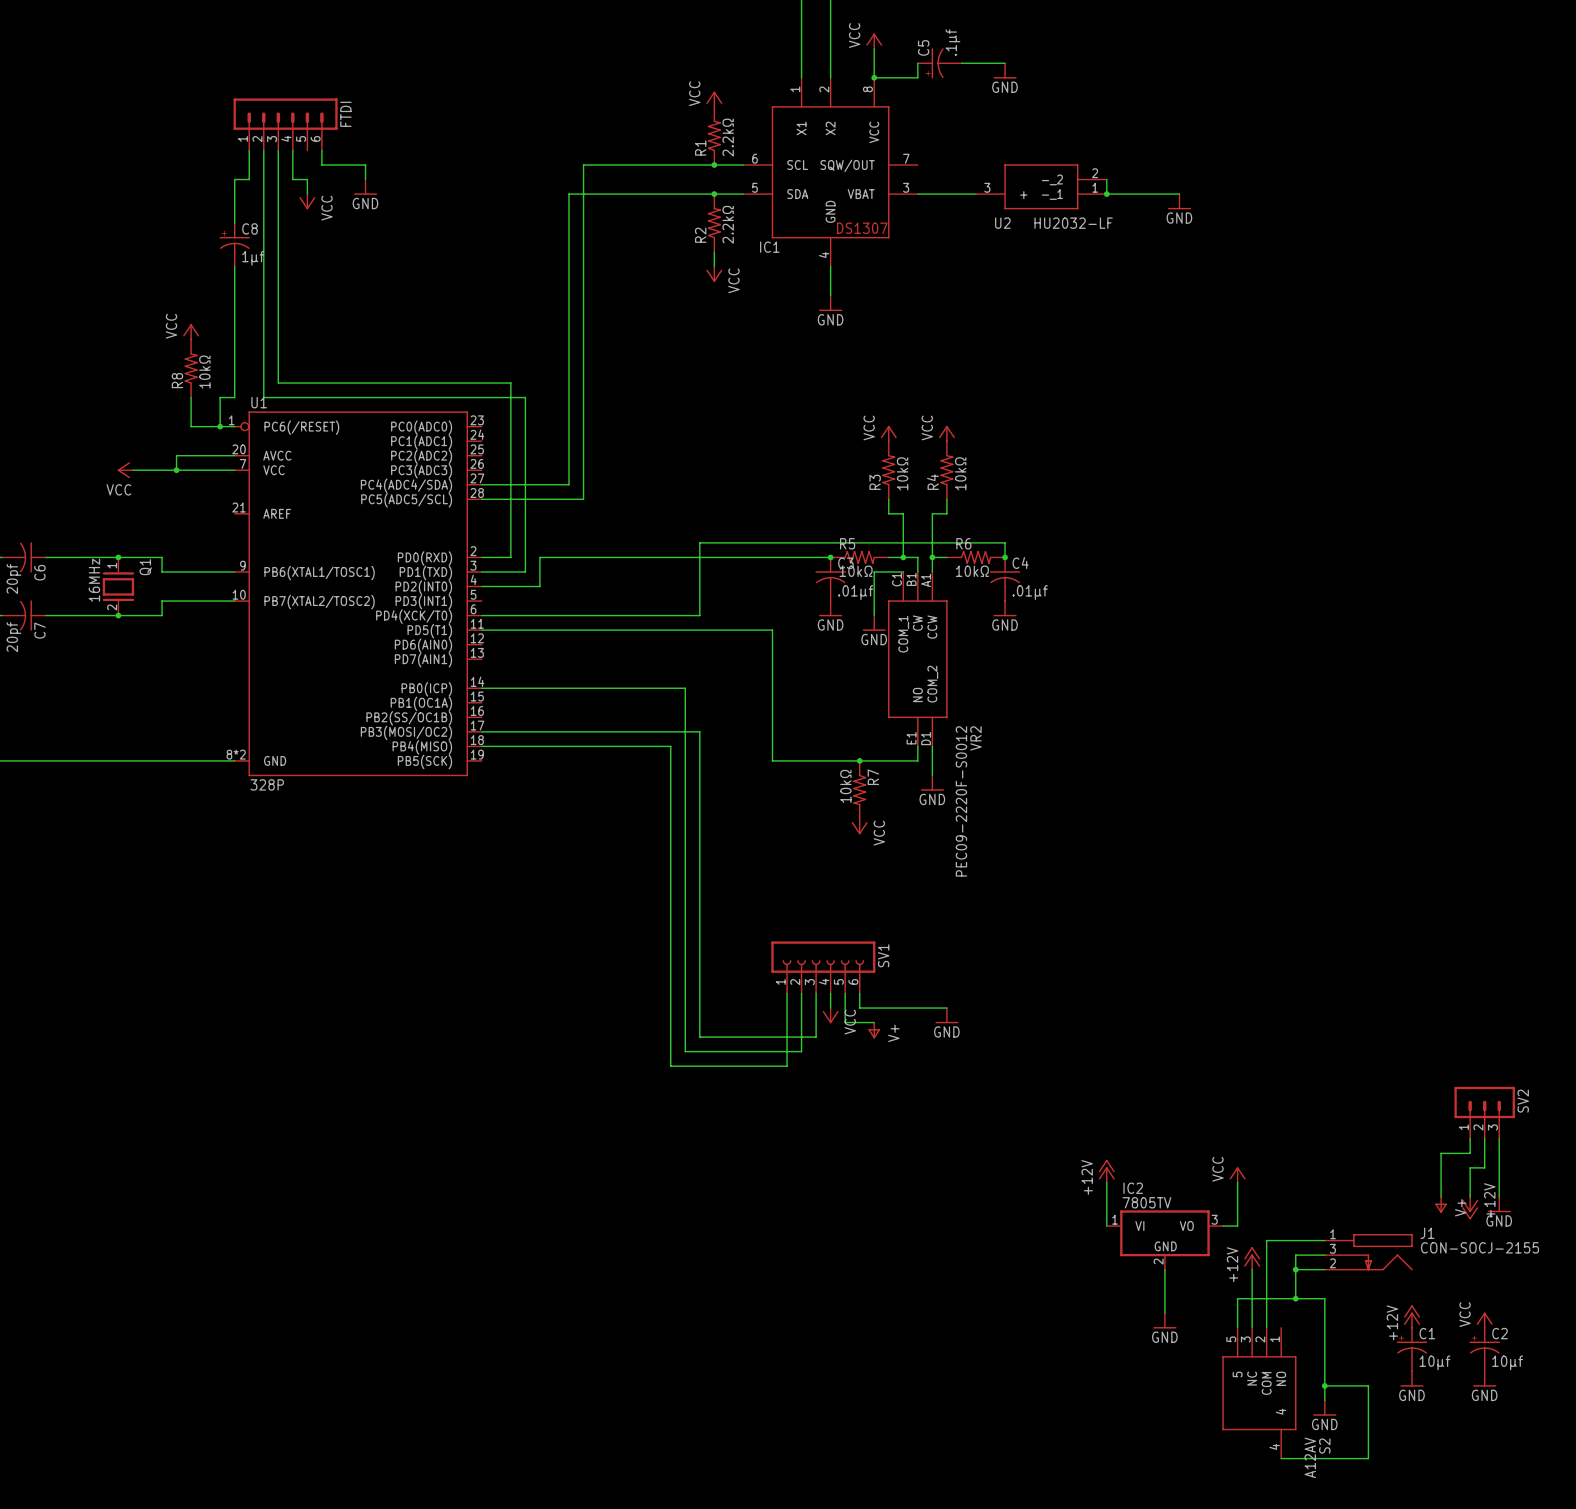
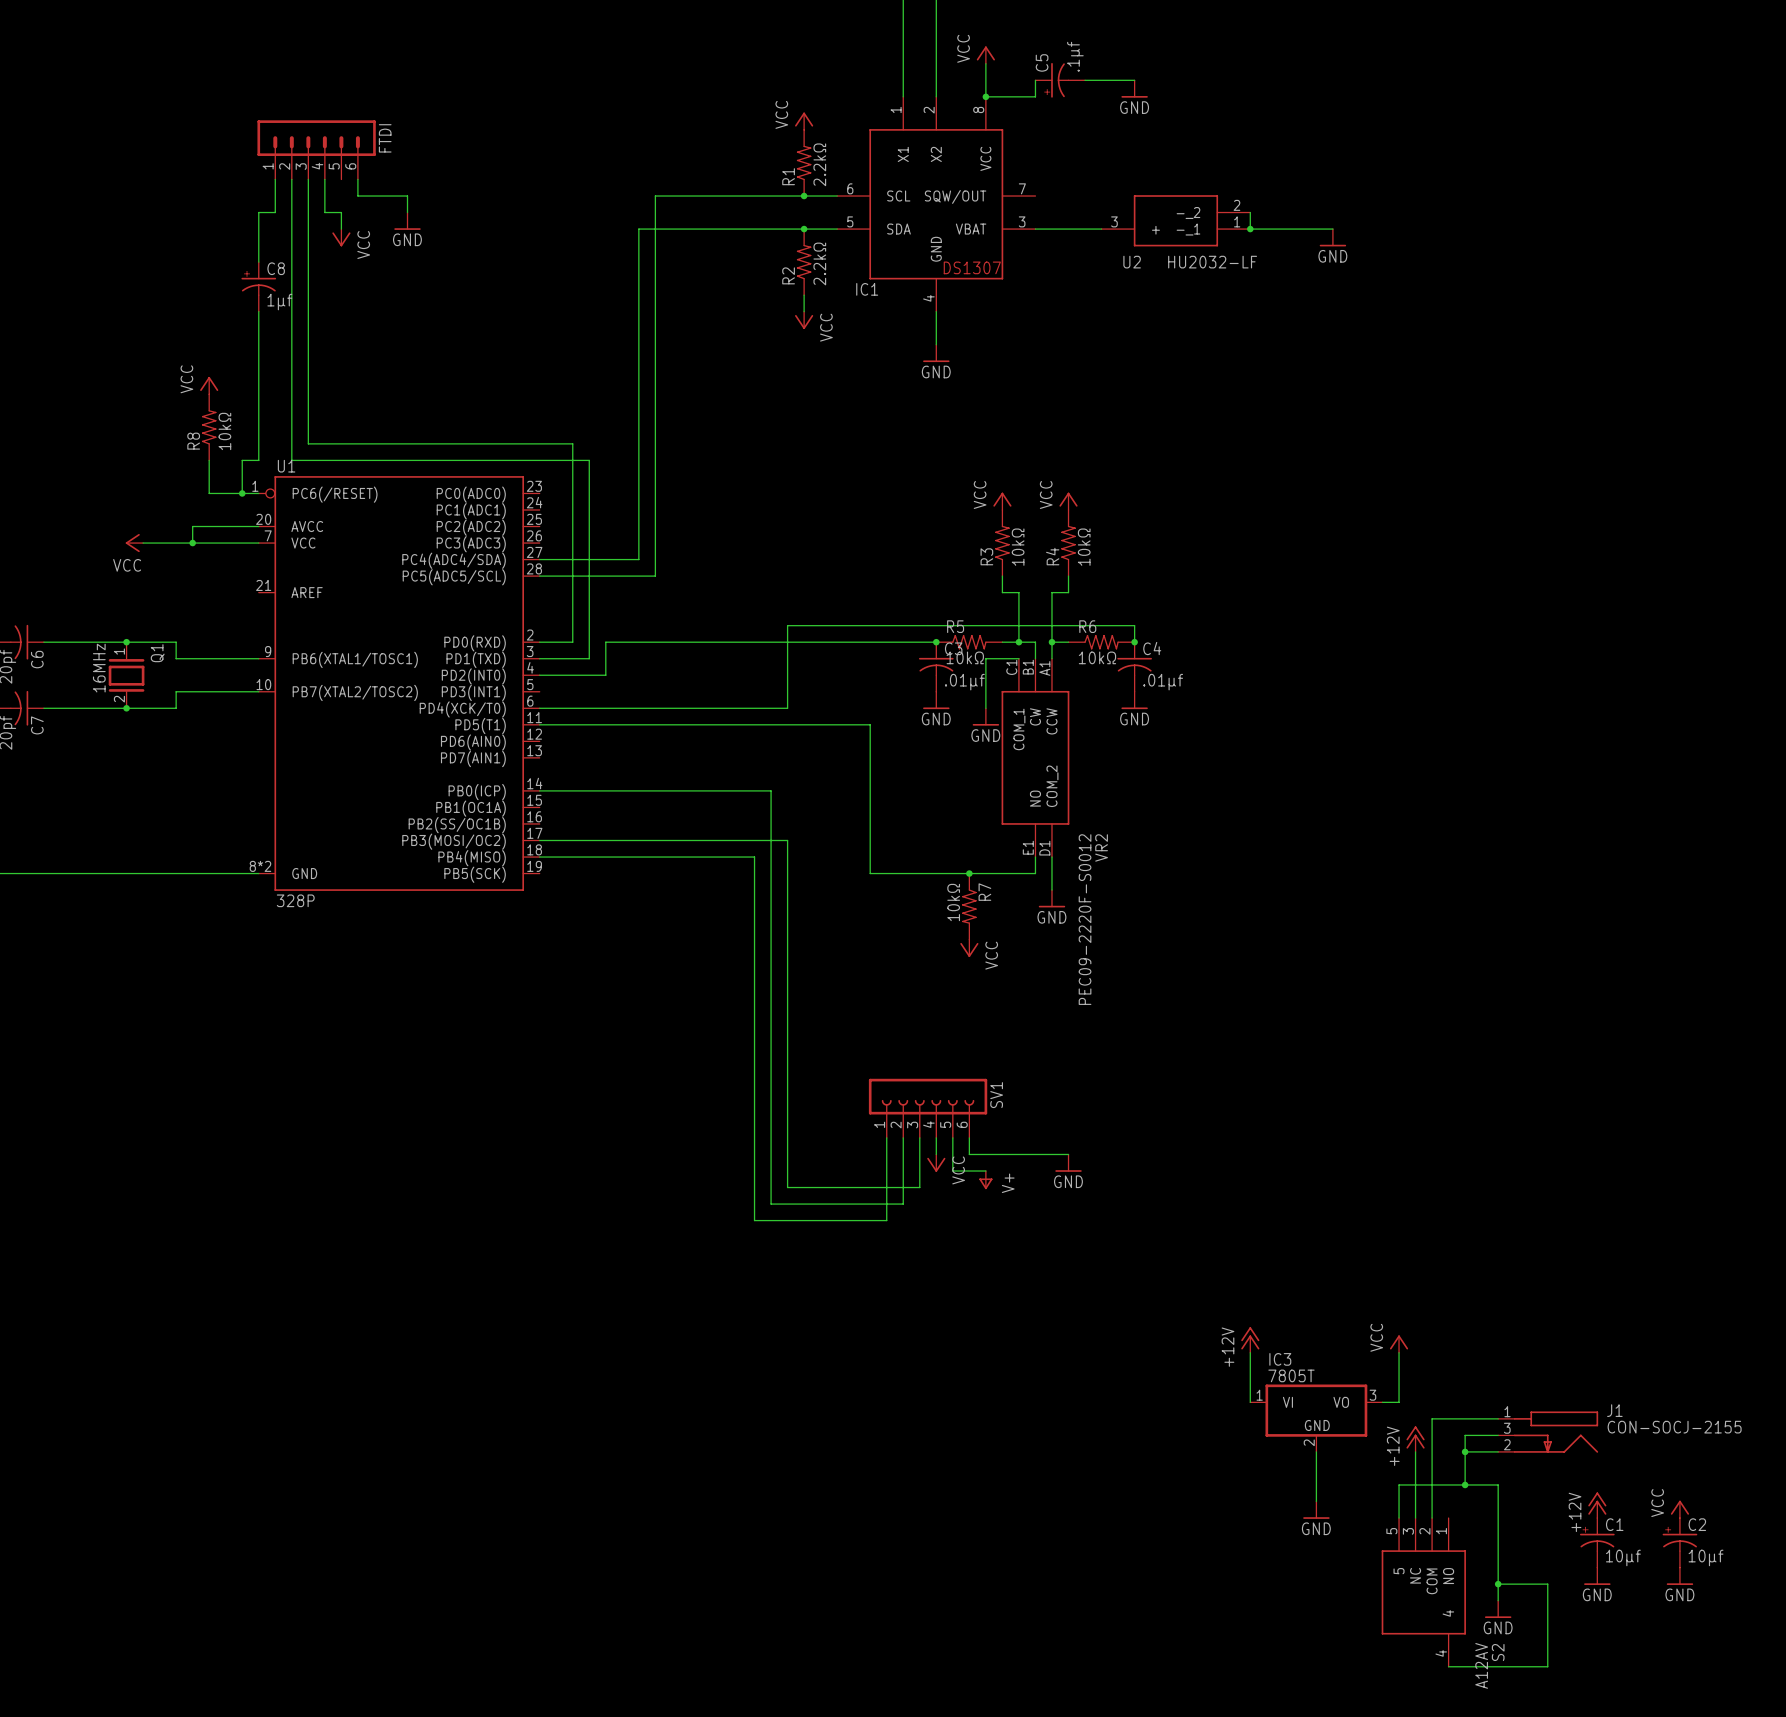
SV2: (1484, 1112) -> none
wire: (1470, 1138) (1470, 1153) (1441, 1153) (1441, 1196) -> none
wire: (1484, 1138) (1484, 1167) (1470, 1167) (1470, 1196) -> none
wire: (1499, 1138) (1499, 1196) -> none
IC2 name: IC2 (1133, 1188) -> IC3 (1280, 1359)
IC2 value: 7805TV (1146, 1202) -> 7805T (1291, 1375)
power symbol: V+ (1441, 1204) -> none
power symbol: GND (1499, 1204) -> none
power symbol: +12V (1470, 1208) -> none

